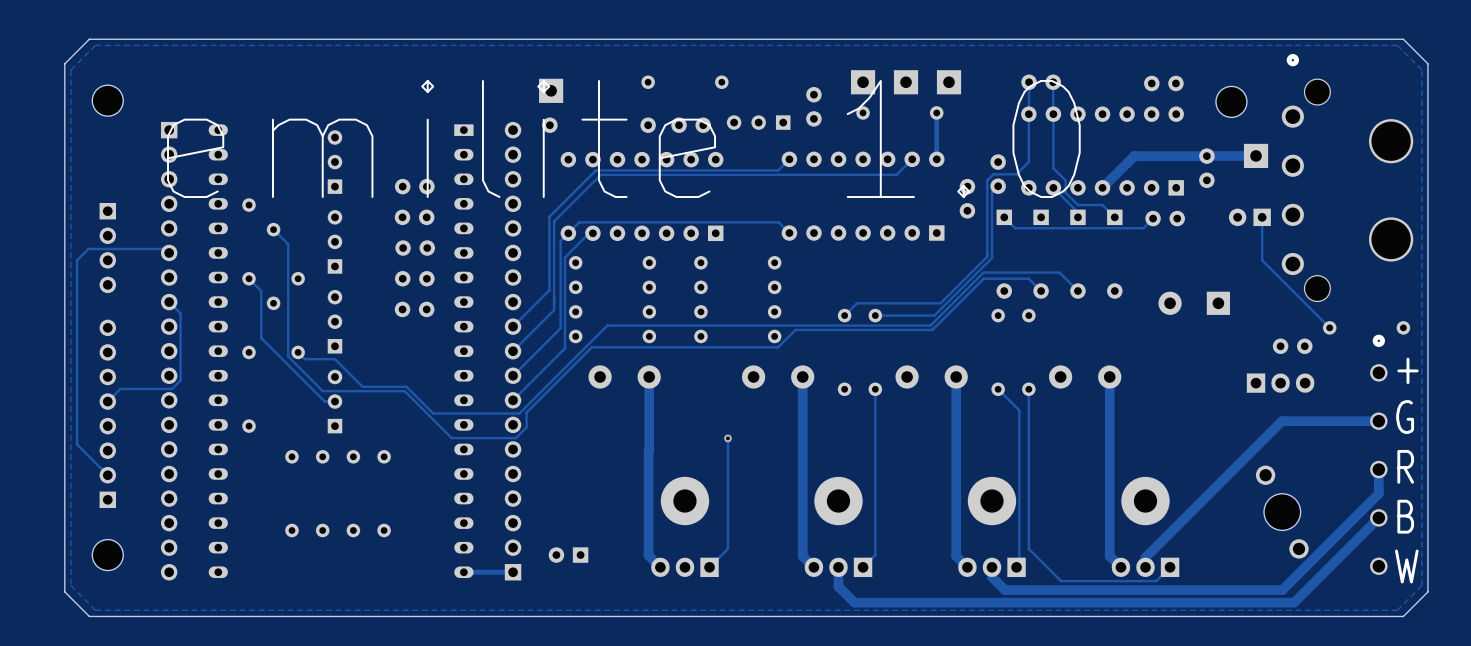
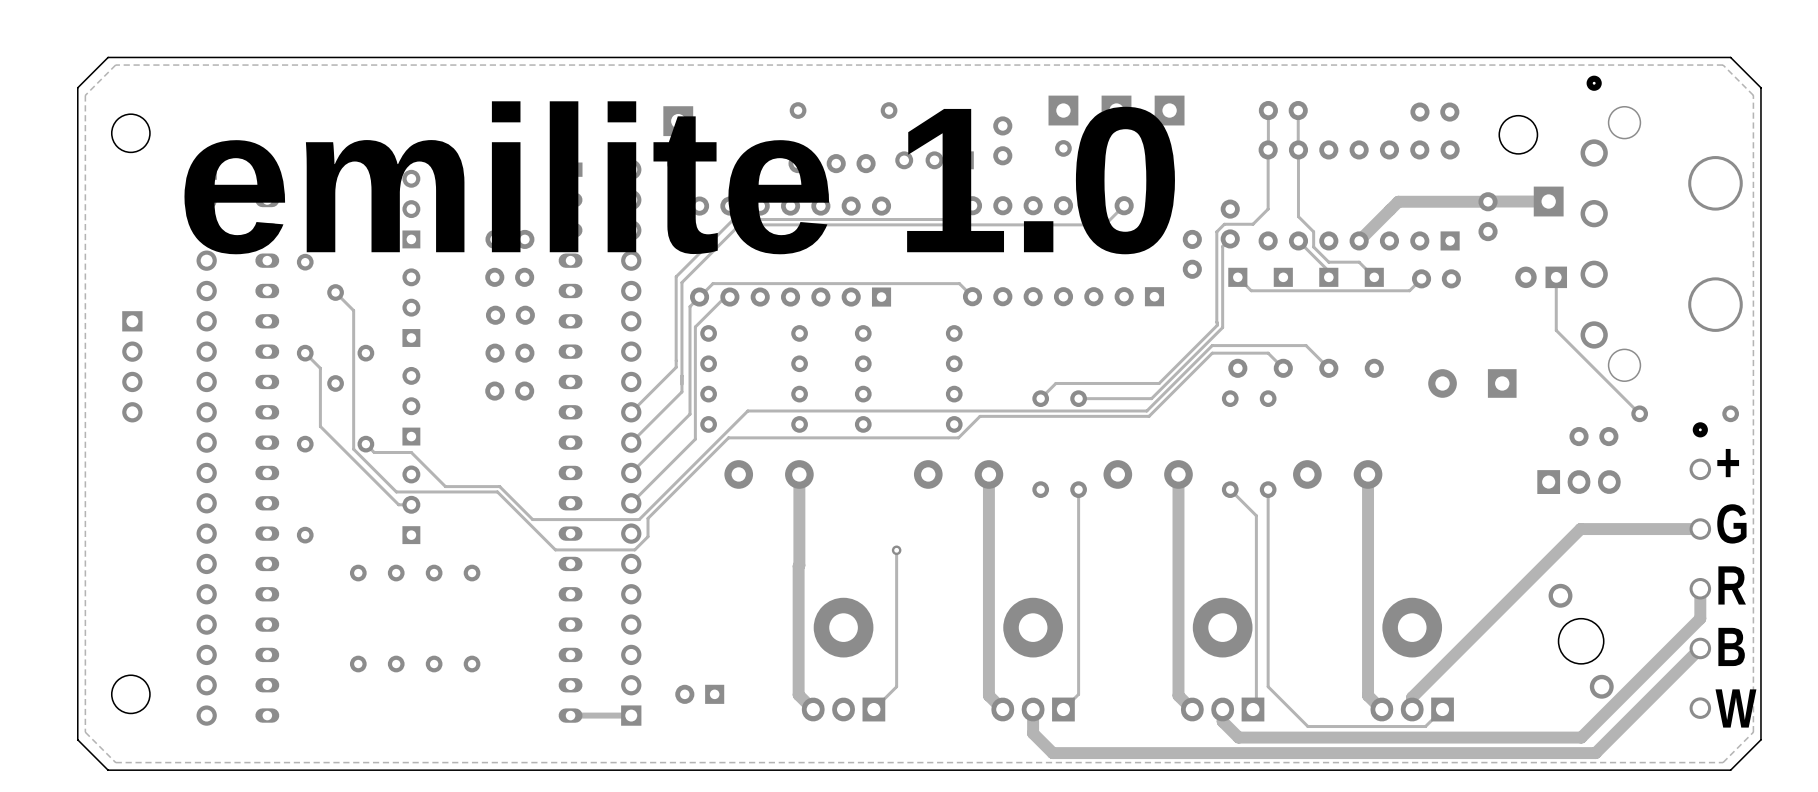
part position: (107, 248) -> (132, 366)
track: (169, 252) (165, 248) (88, 248) (77, 260) (77, 444) (107, 475) -> none
track: (169, 302) (180, 313) (180, 380) (172, 388) (120, 388) (107, 401) -> none
part: (107, 413) -> none

